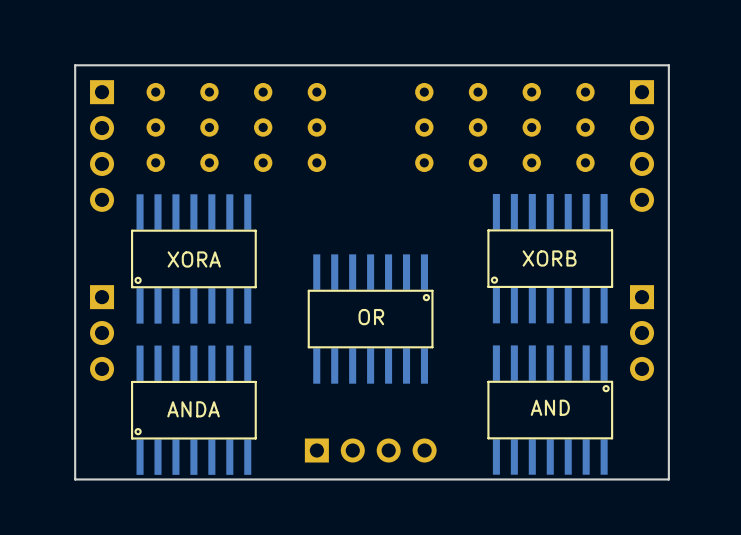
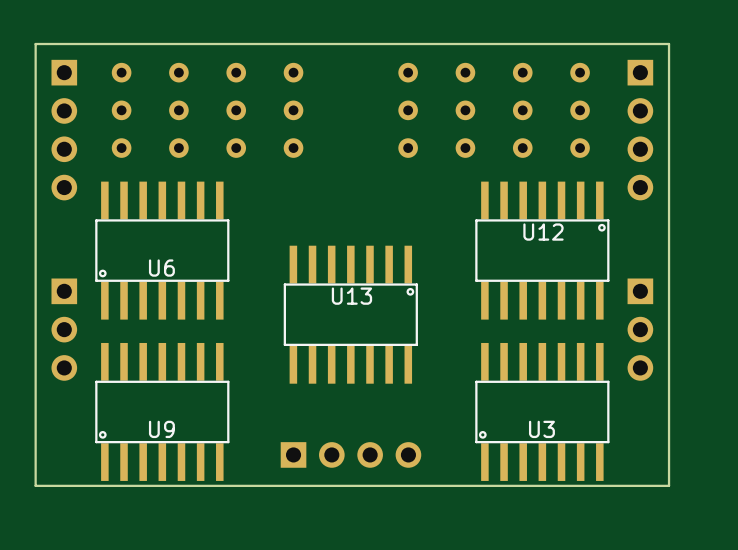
XORB: (550, 258) -> none
U12: none -> (542, 250)
XORA name: XORA (194, 259) -> U6 (161, 268)
OR name: OR (371, 317) -> U13 (351, 296)
ANDA name: ANDA (193, 409) -> U9 (161, 429)
AND: (550, 410) -> none
U3: none -> (542, 411)

